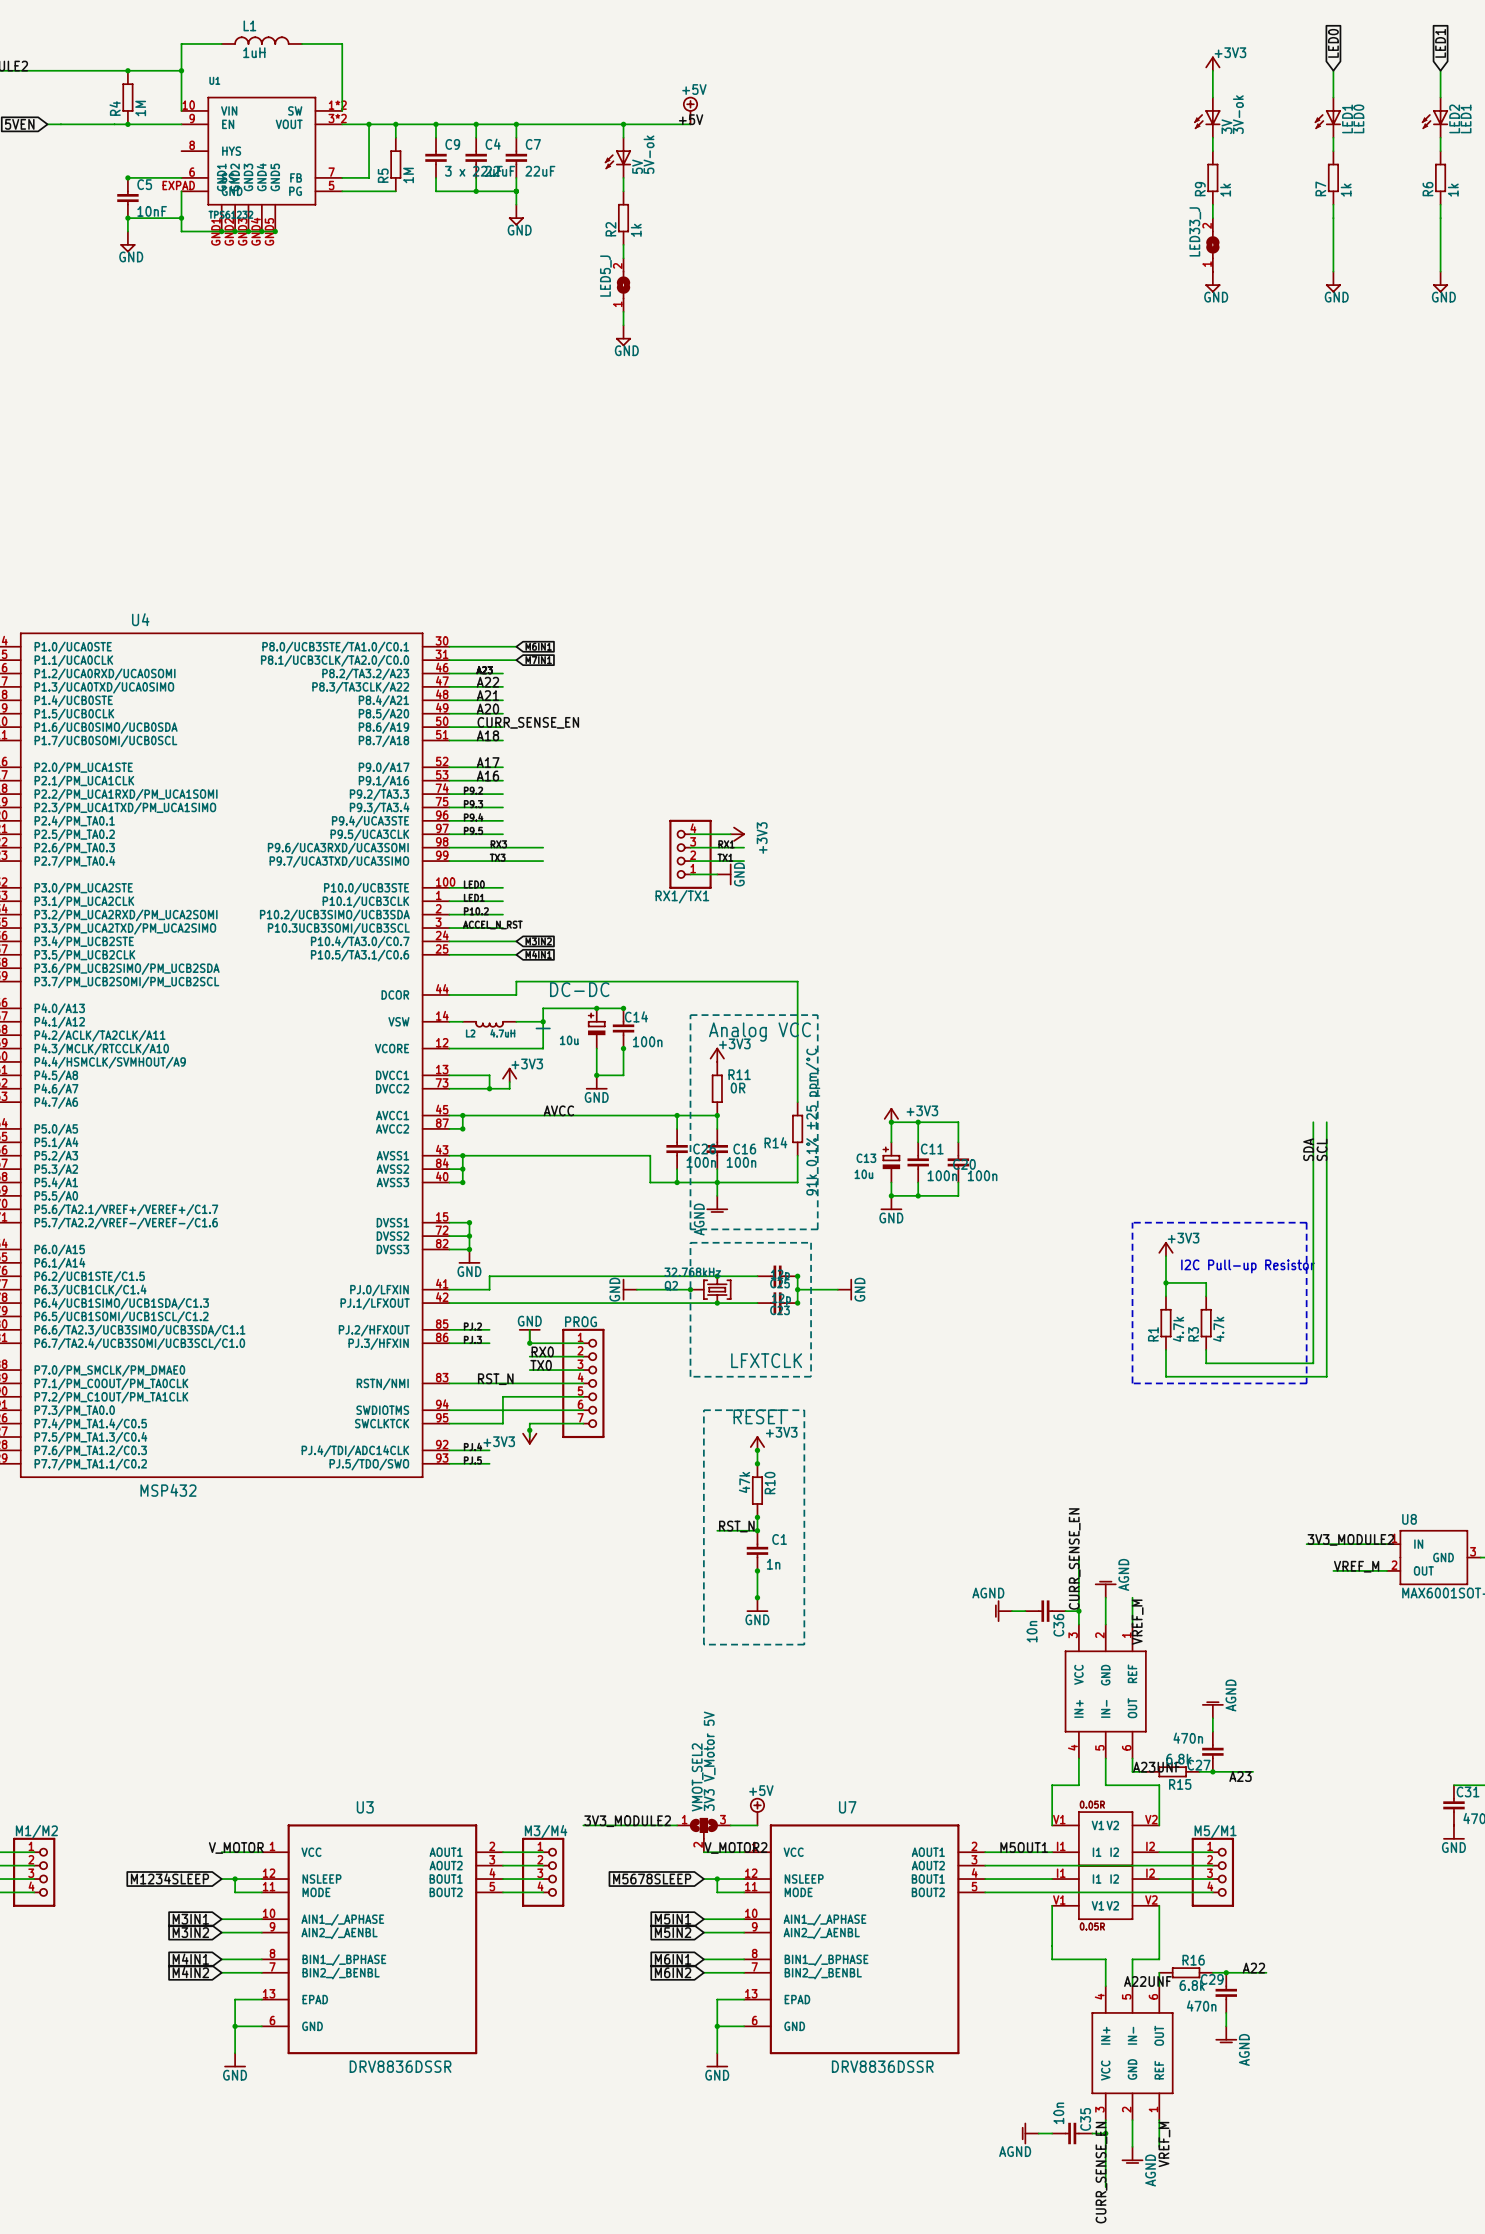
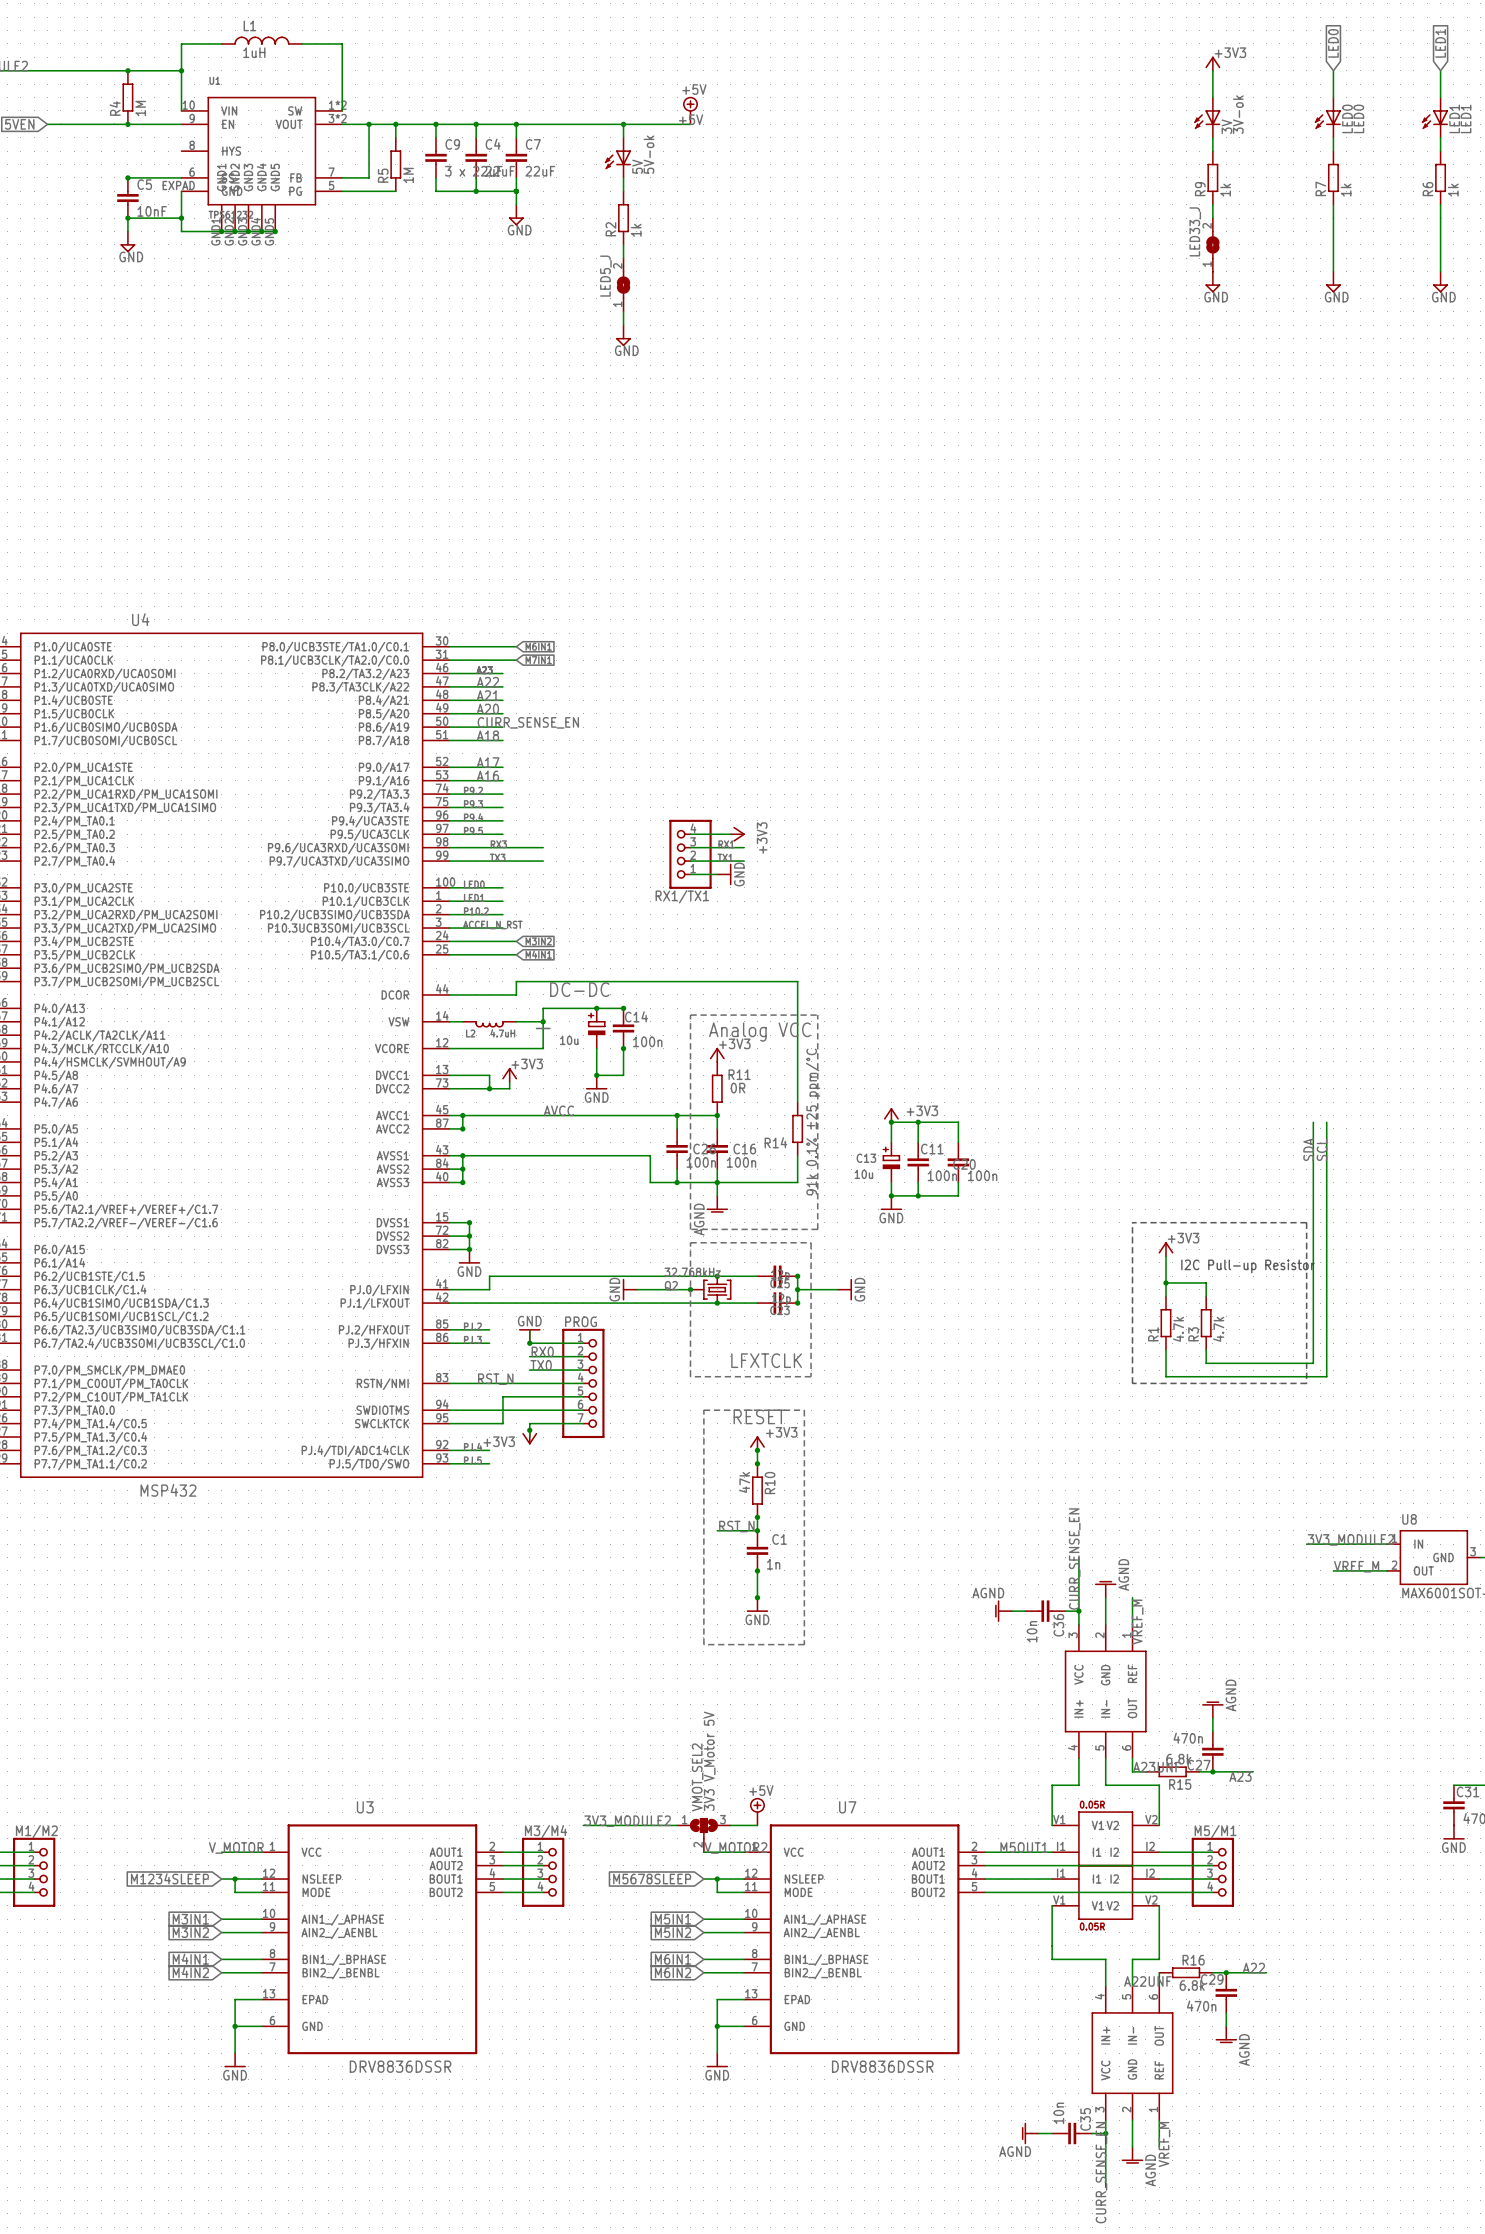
LED1 name: LED1 (1347, 118) -> LED0 (1347, 118)
LED2 name: LED2 (1454, 118) -> LED1 (1454, 118)

